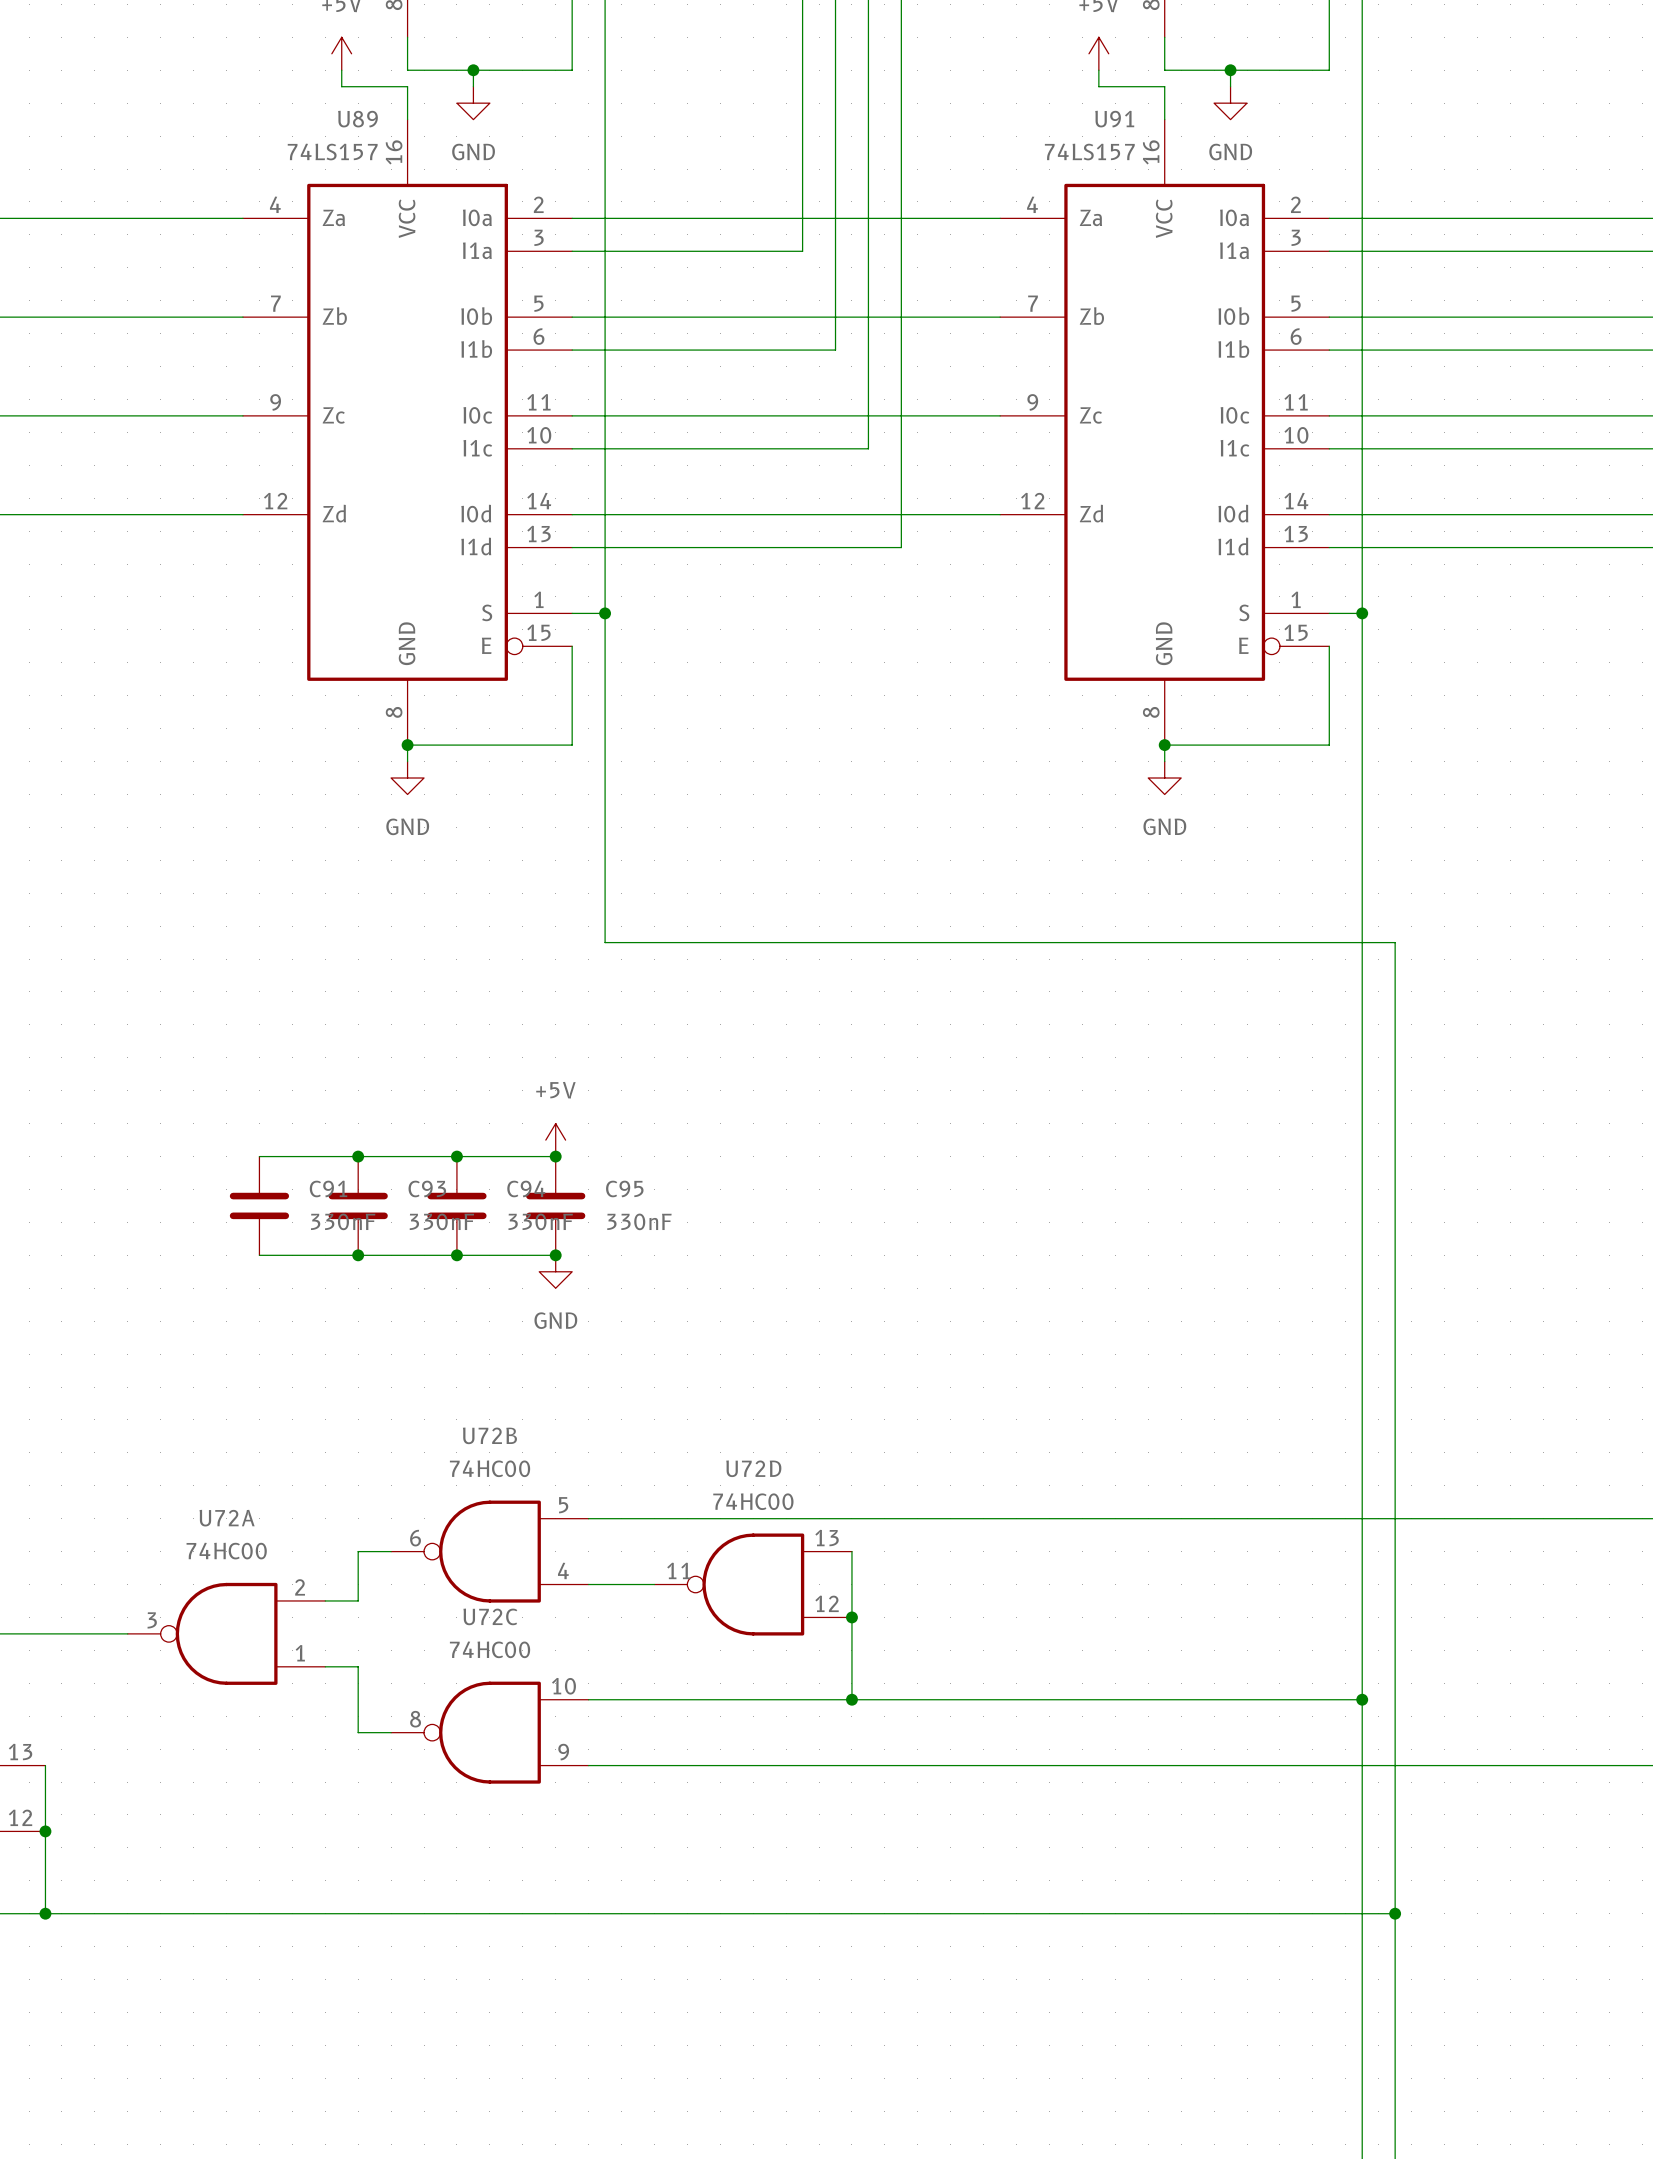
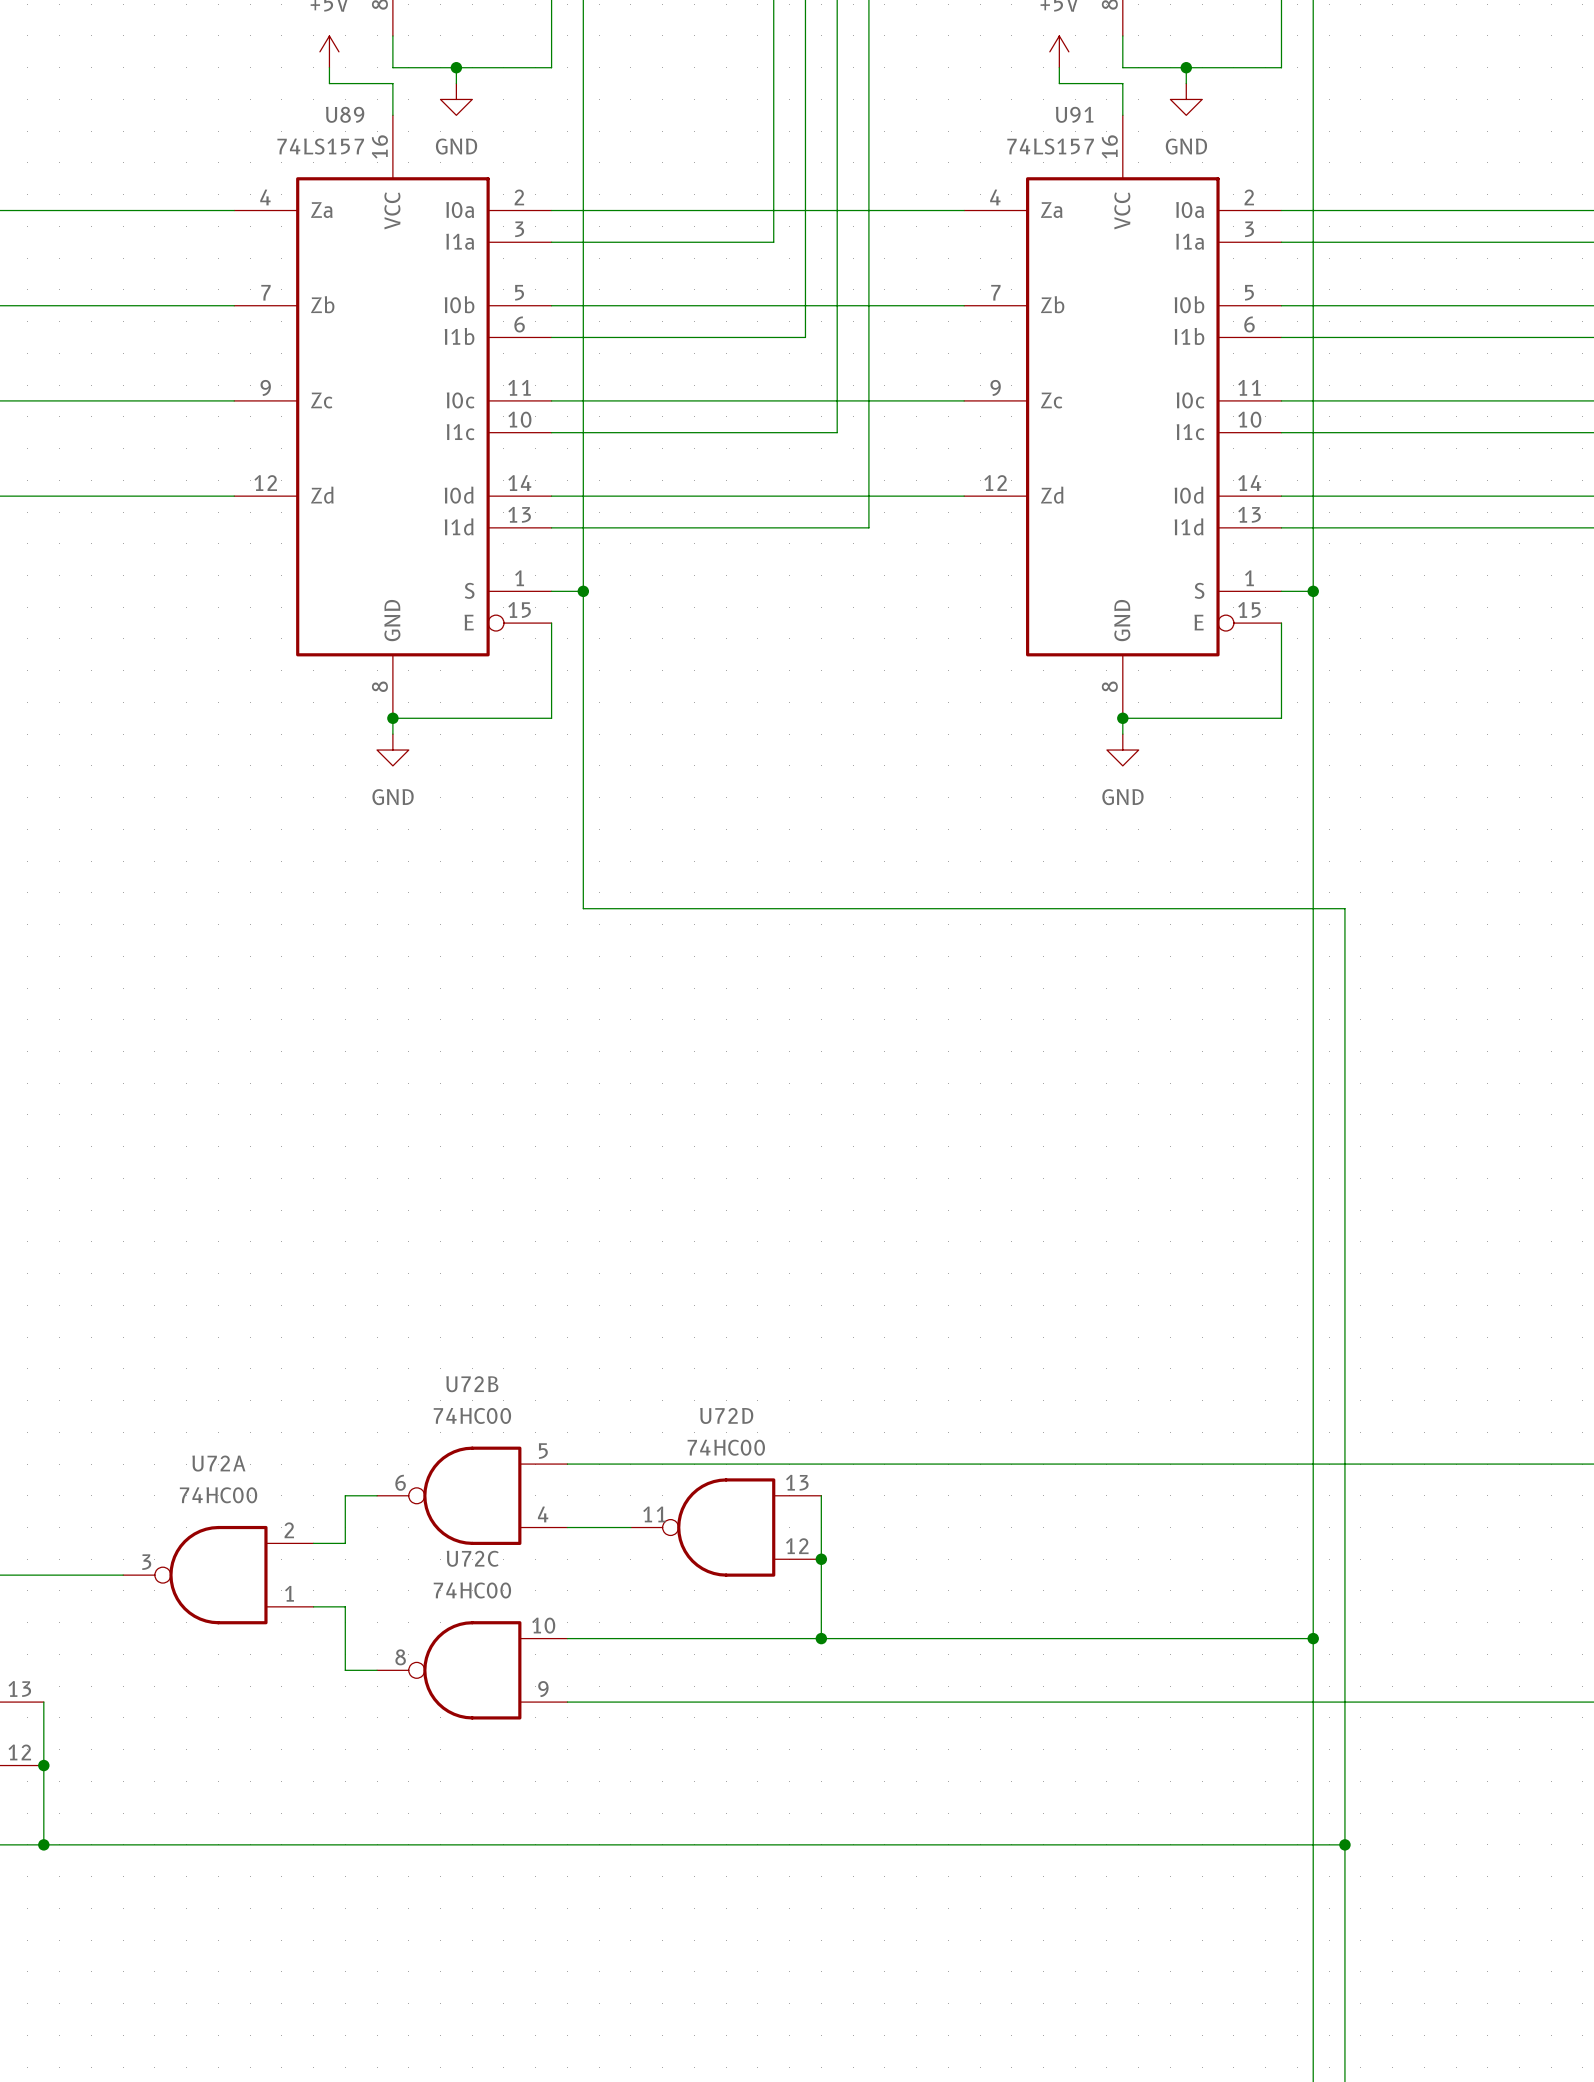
power symbol: +5V (555, 1140) -> none
wire: (259, 1156) (555, 1156) -> none
junction: (358, 1156) -> none
junction: (456, 1156) -> none
junction: (555, 1156) -> none
C91: 330nF (259, 1205) -> none
C93: 330nF (358, 1205) -> none
C94: 330nF (456, 1205) -> none
C95: 330nF (555, 1205) -> none
wire: (259, 1255) (555, 1255) -> none
junction: (358, 1255) -> none
junction: (456, 1255) -> none
junction: (555, 1255) -> none
power symbol: GND (555, 1271) -> none

